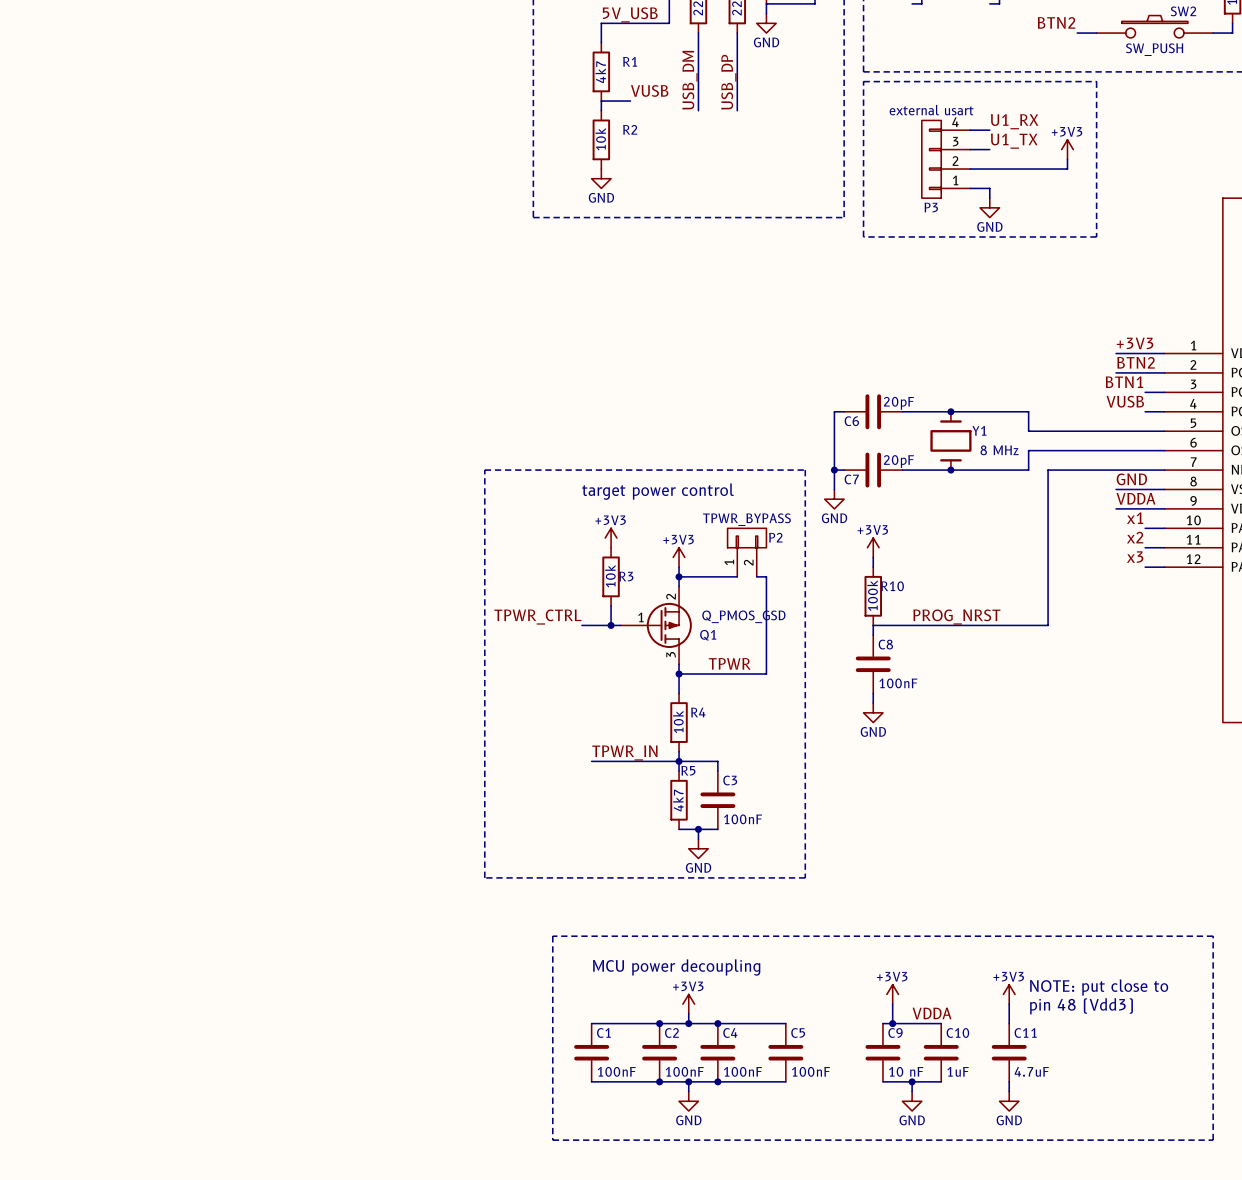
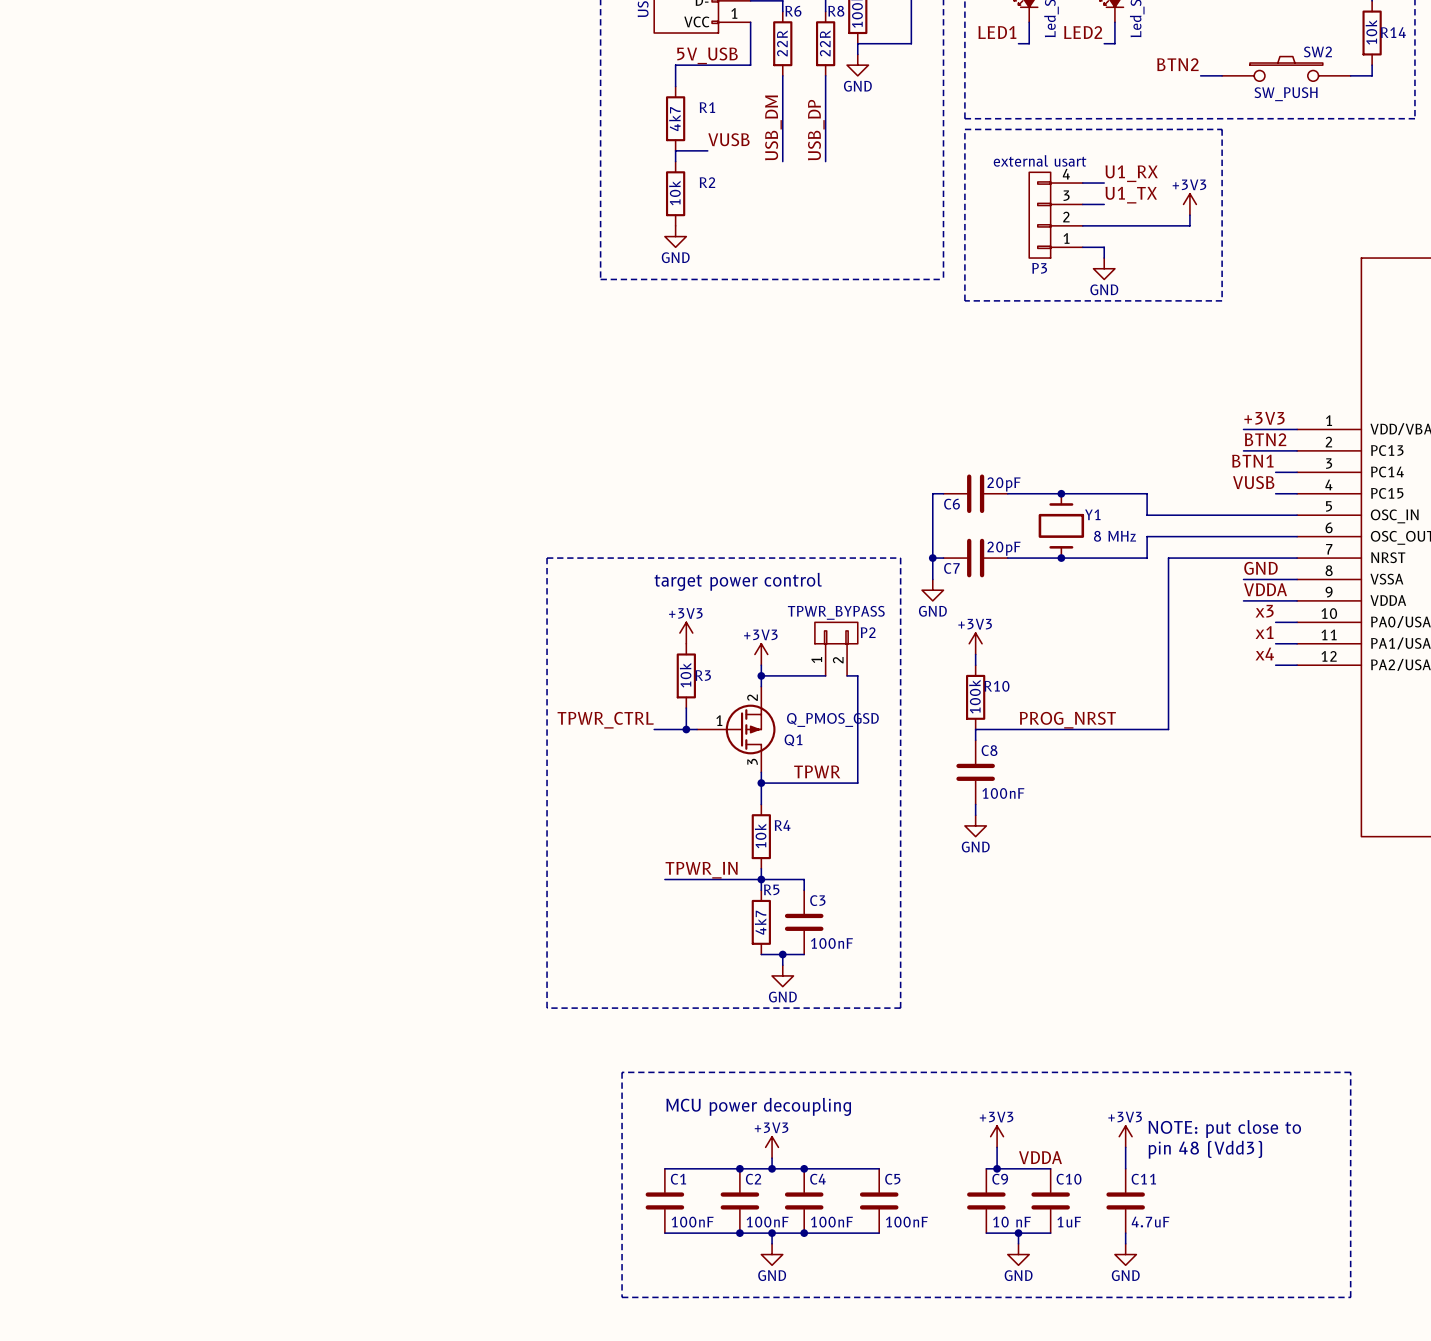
label: x1 (1135, 518) -> x3 (1264, 611)
label: x2 (1135, 537) -> x1 (1264, 632)
label: x3 (1135, 557) -> x4 (1264, 653)

